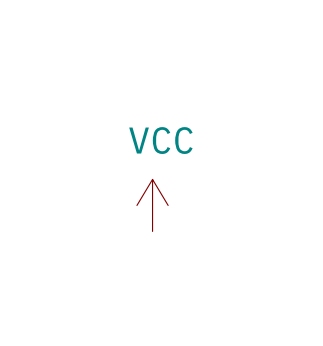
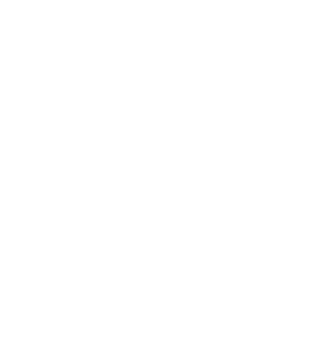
power symbol: VCC (152, 205) -> none

